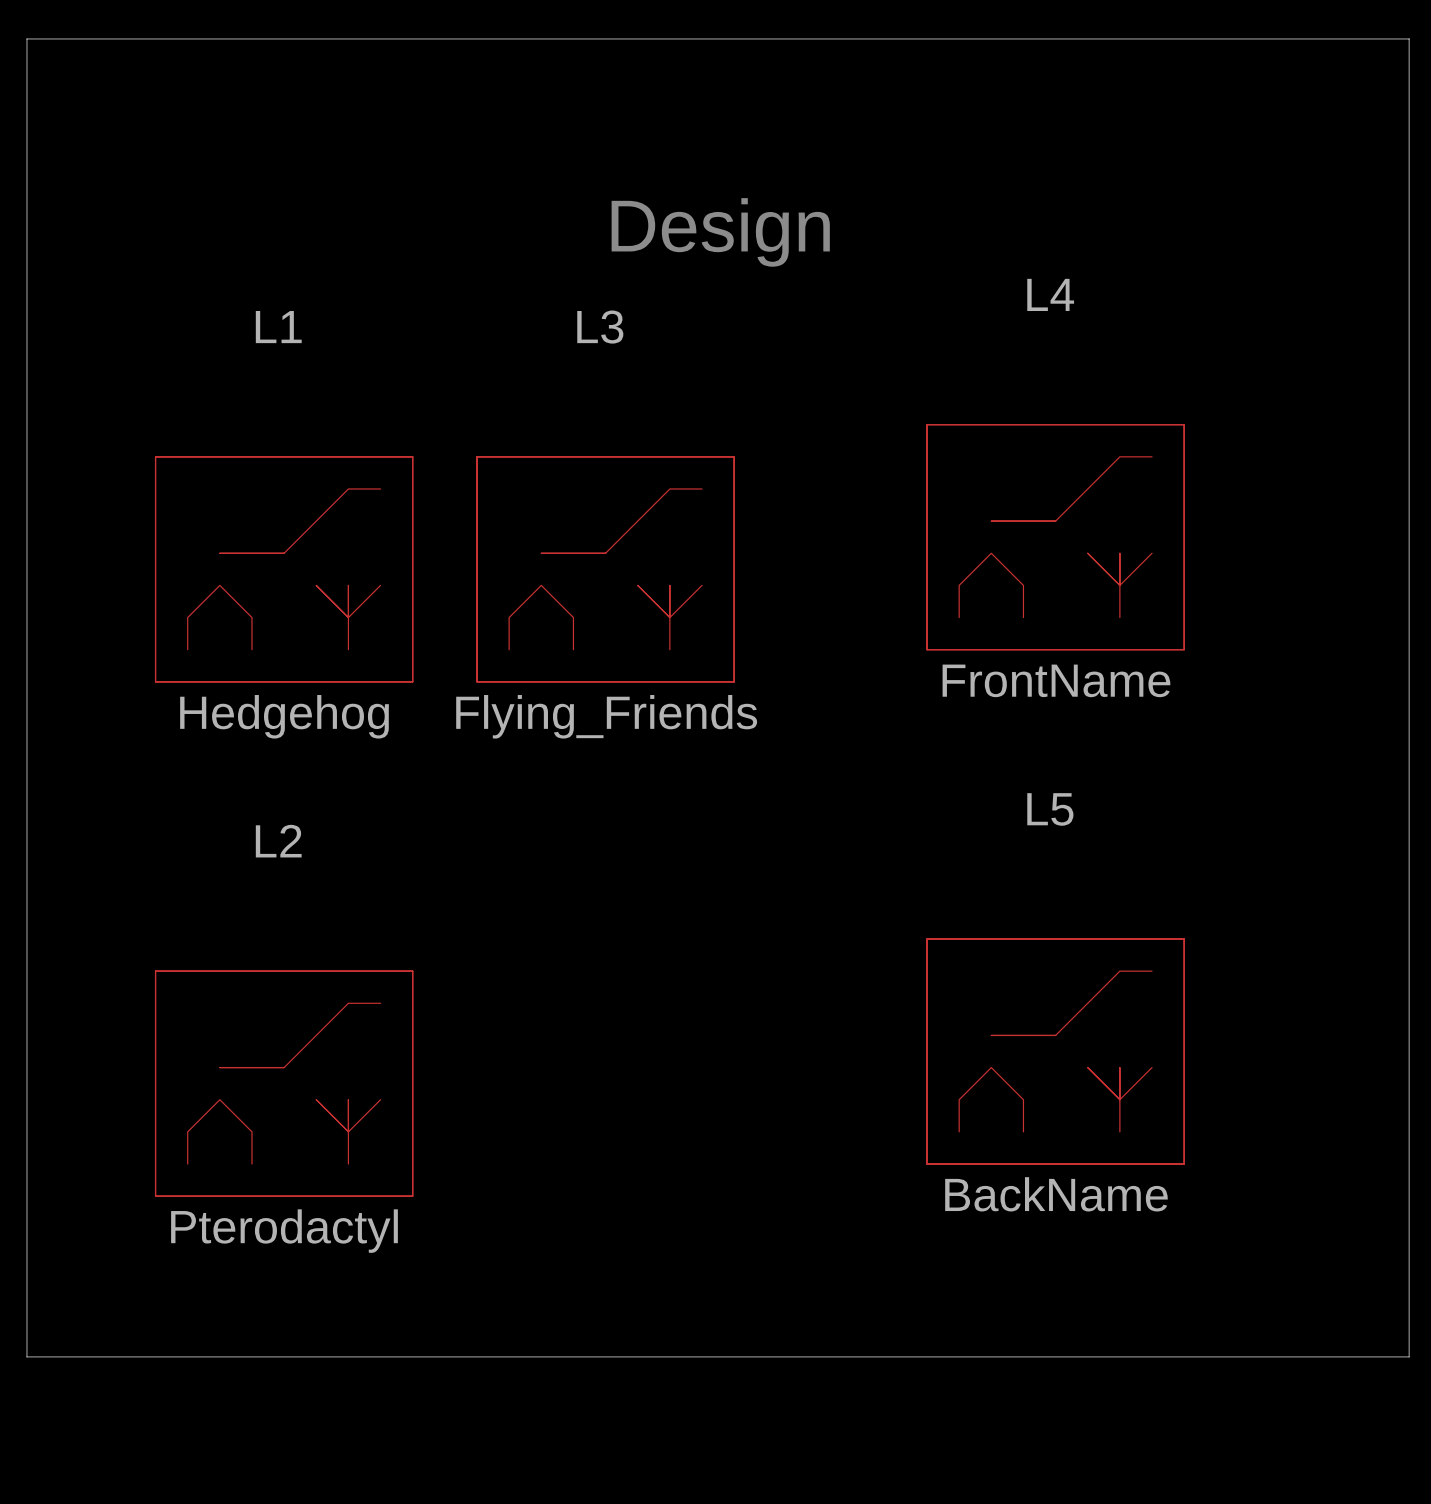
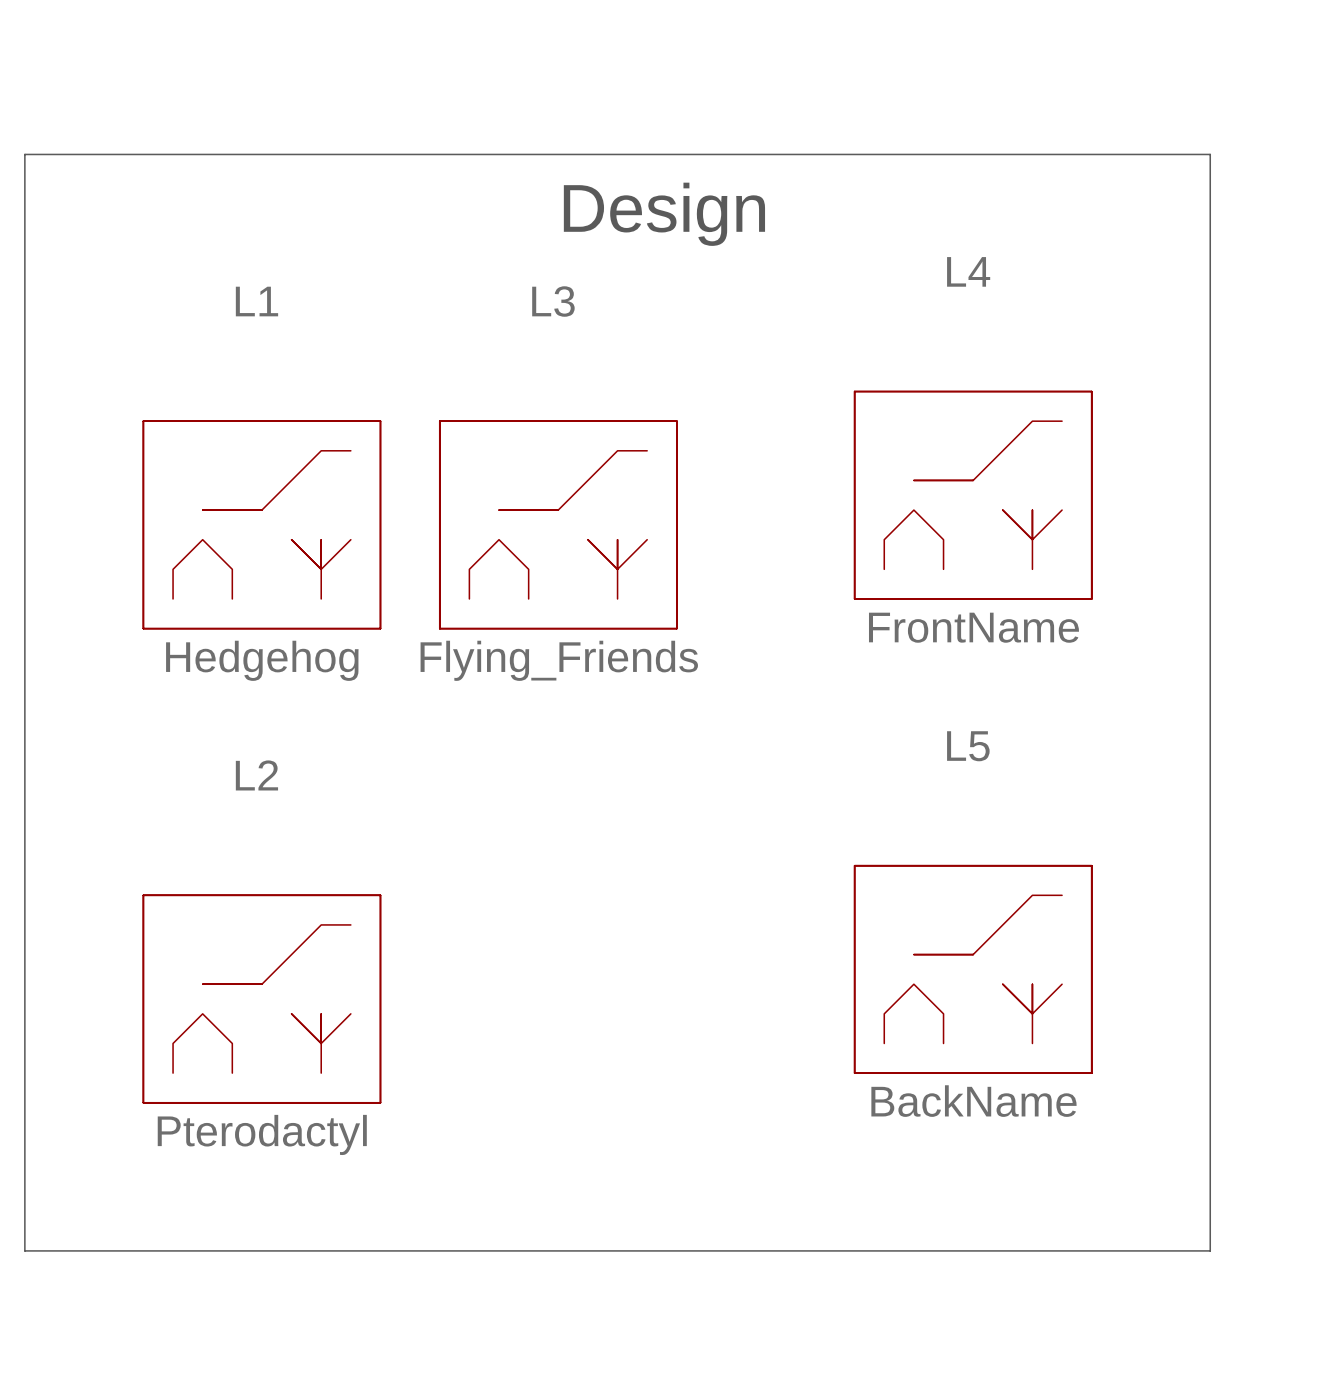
line: (26, 167) (26, 38) (1409, 38) (1409, 1356) (1312, 1356) -> (24, 154) (1210, 154) (1210, 1250)

